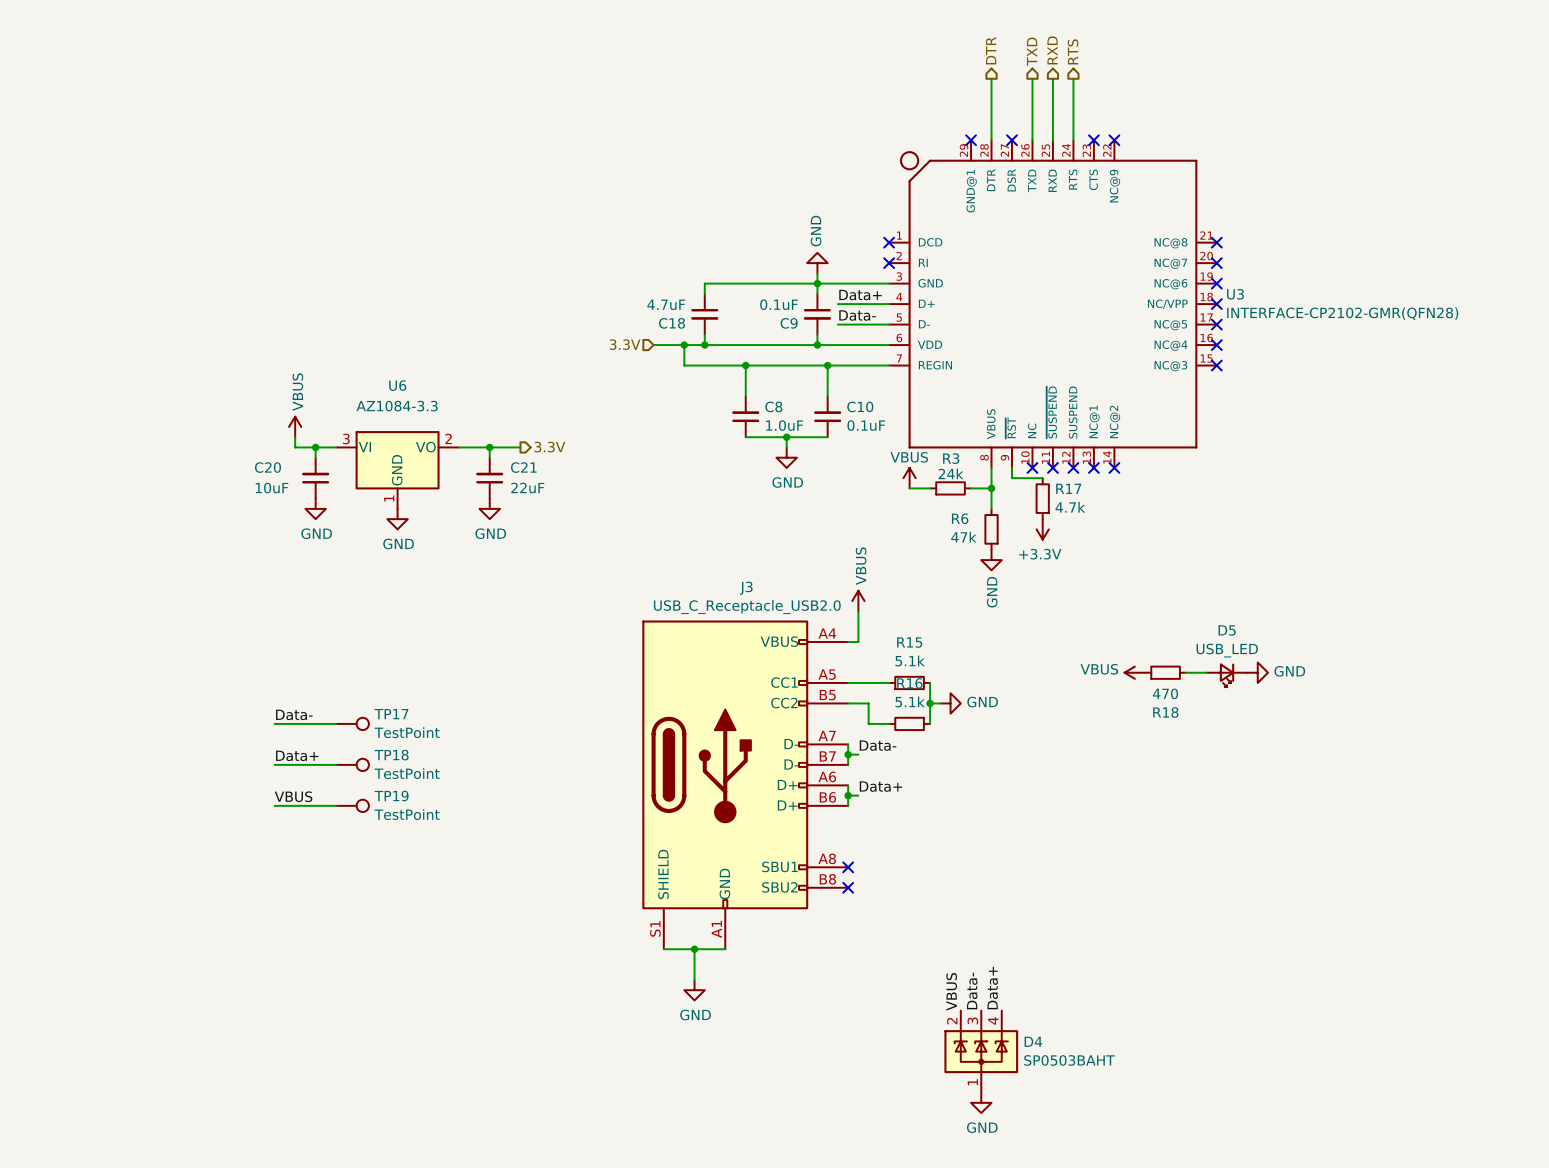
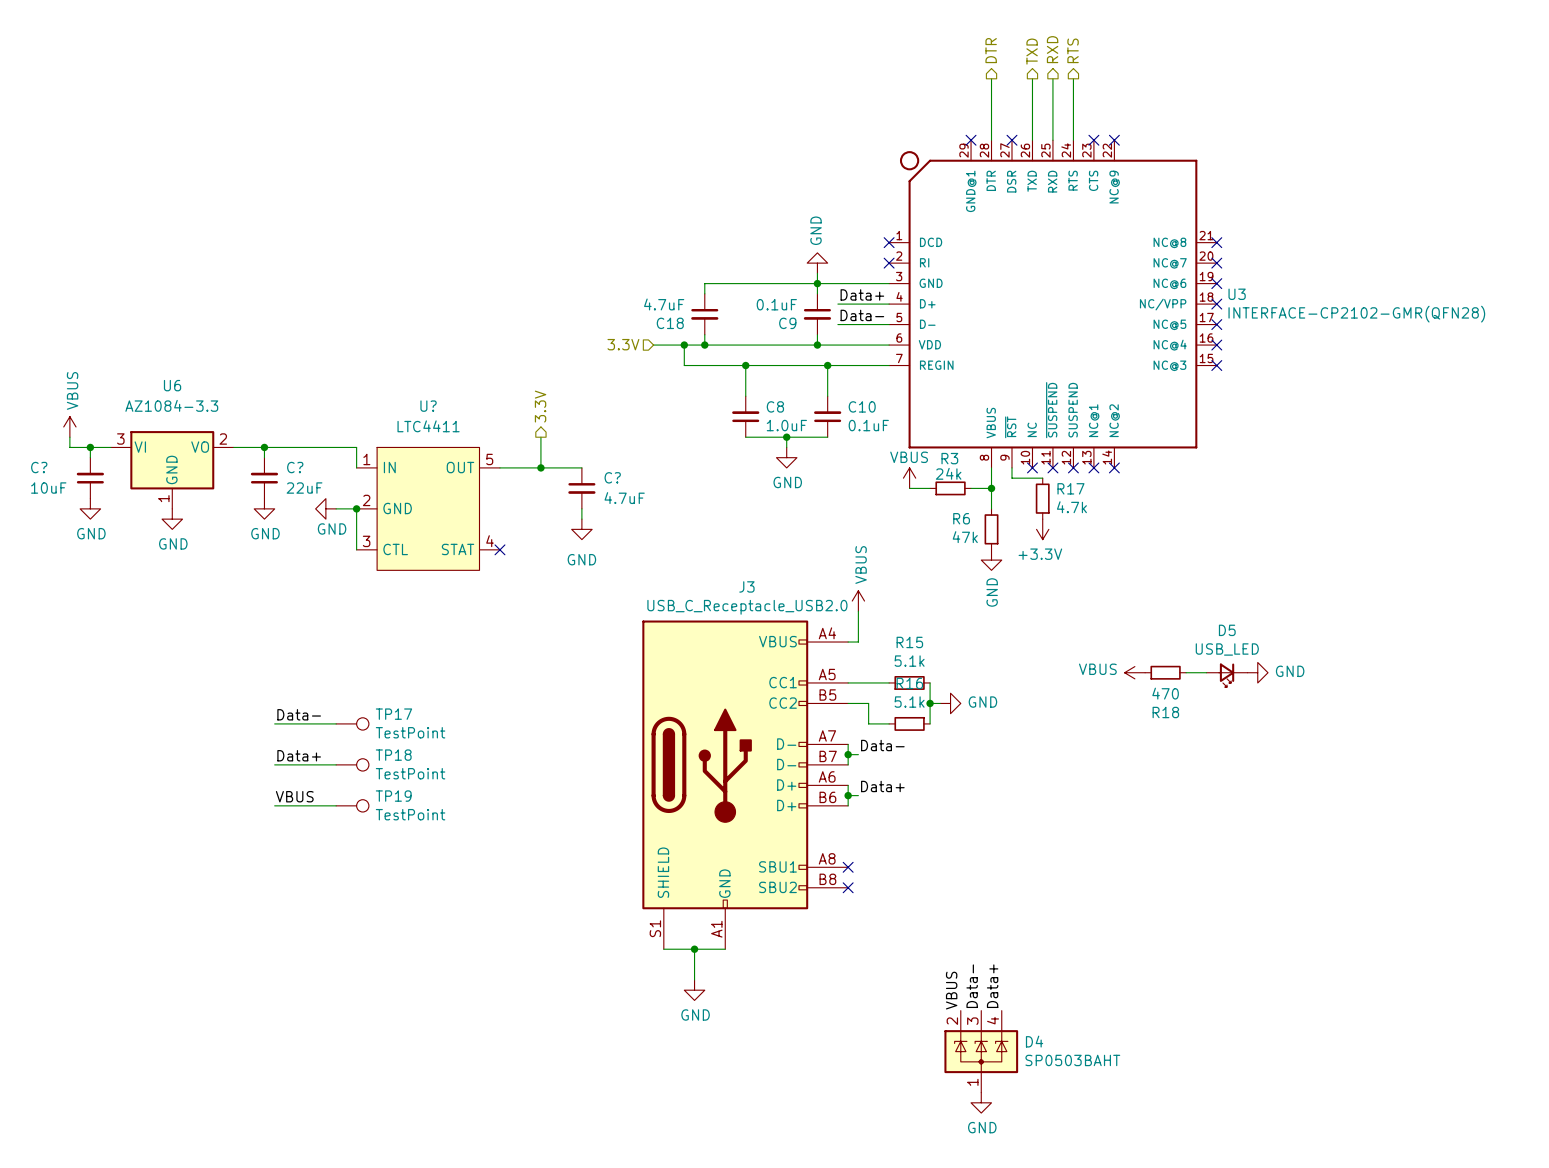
power symbol: none -> VBUS (69, 426)
power symbol: VBUS (295, 426) -> none
wire: none -> (69, 437) (69, 447) (110, 447)
wire: (295, 437) (295, 447) -> (233, 447) (295, 447)
wire: none -> (540, 437) (540, 467)
wire: none -> (90, 447) (90, 457)
junction: none -> (90, 447)
junction: none -> (264, 447)
wire: (315, 447) (315, 457) -> (264, 447) (264, 457)
junction: (315, 447) -> none
wire: (459, 447) (520, 447) -> none
wire: (489, 447) (489, 457) -> (581, 508) (581, 519)
junction: (489, 447) -> none
hierarchical label rotation: 0° (549, 447) -> 90° counterclockwise (540, 406)
hierarchical label position: 3.3V (549, 447) -> 3.3V (540, 406)
wire: none -> (499, 467) (581, 467)
junction: none -> (540, 467)
U6 position: (397, 469) -> (172, 469)
C?: none -> 10uF (90, 478)
C?: none -> 22uF (264, 478)
C20: 10uF (315, 478) -> none
C21: 22uF (489, 478) -> none
C?: none -> 4.7uF (581, 488)
power symbol: none -> GND (90, 508)
power symbol: none -> GND (264, 508)
power symbol rotation: 0° (315, 508) -> 90° clockwise (325, 508)
wire: none -> (336, 508) (356, 508) (356, 549)
junction: none -> (356, 508)
U?: none -> LTC4411 (428, 508)
power symbol: GND (489, 508) -> none
power symbol: none -> GND (172, 519)
power symbol: GND (397, 519) -> none
power symbol: none -> GND (581, 529)
no-connect mark: none -> (499, 549)

